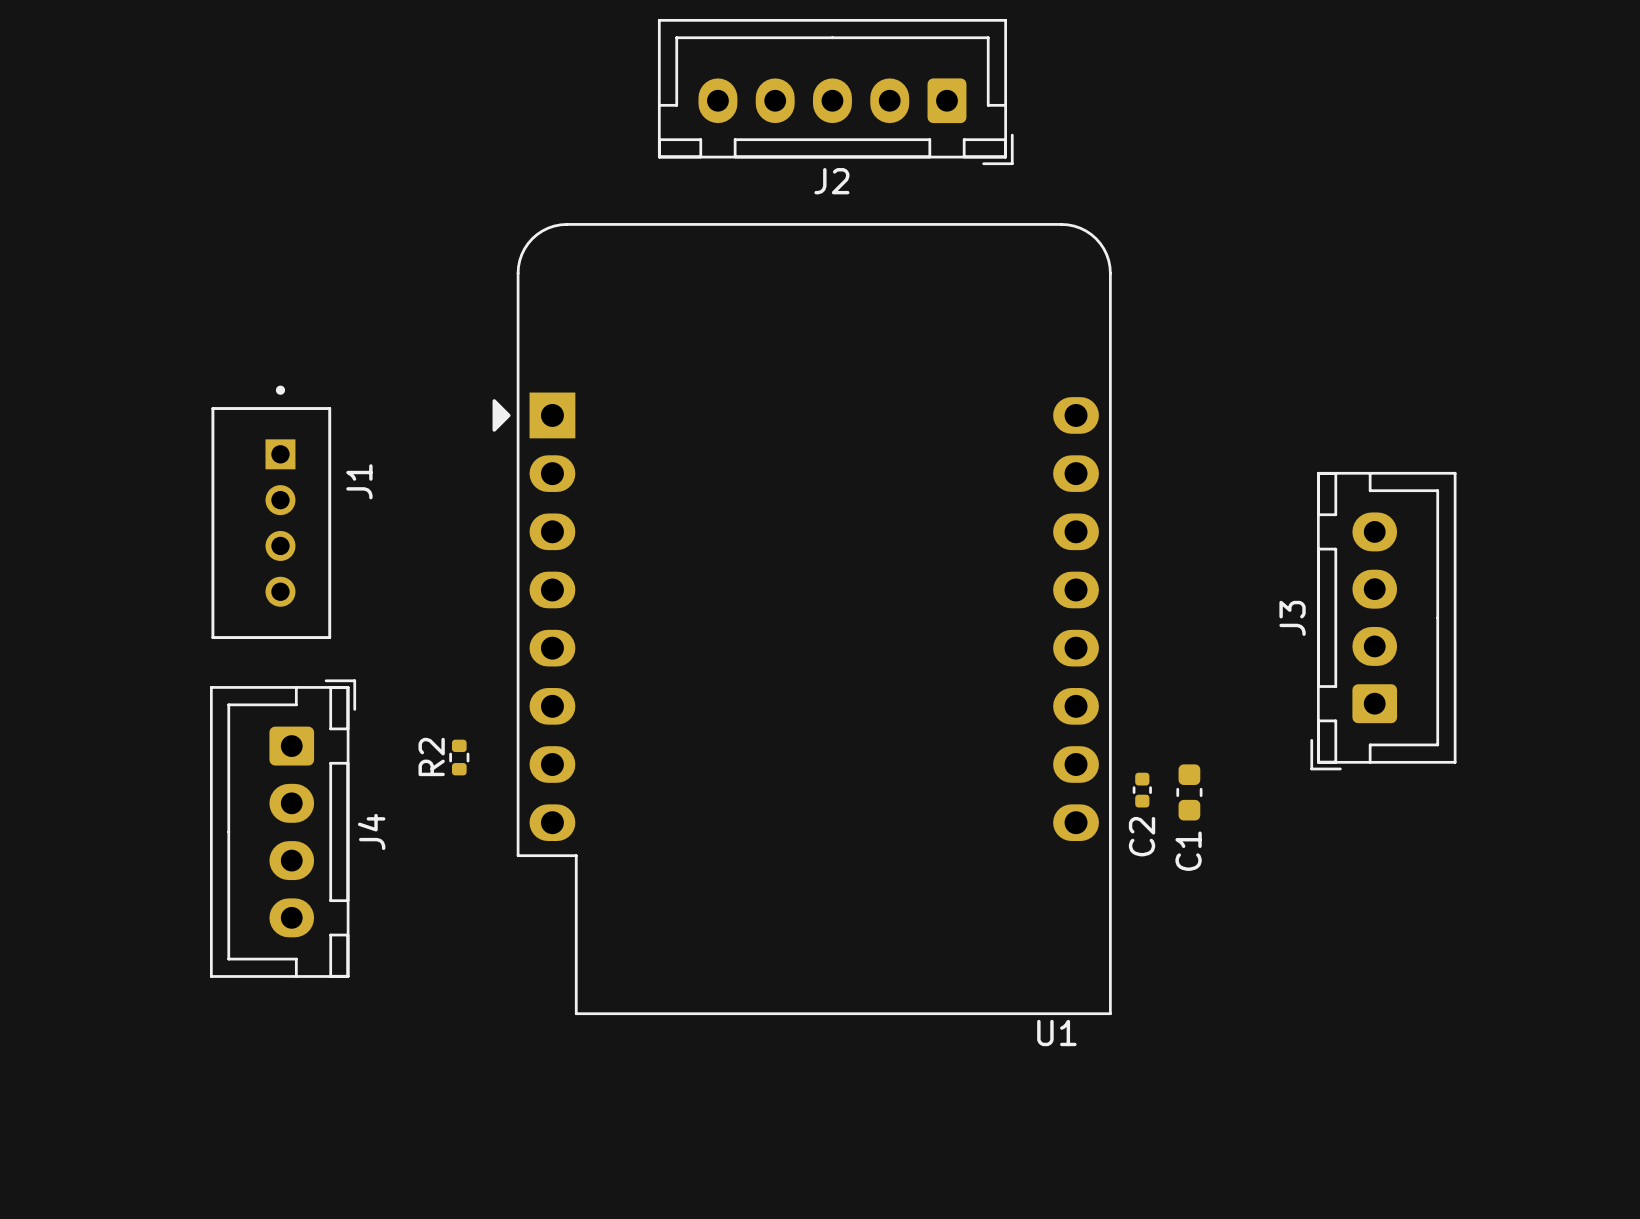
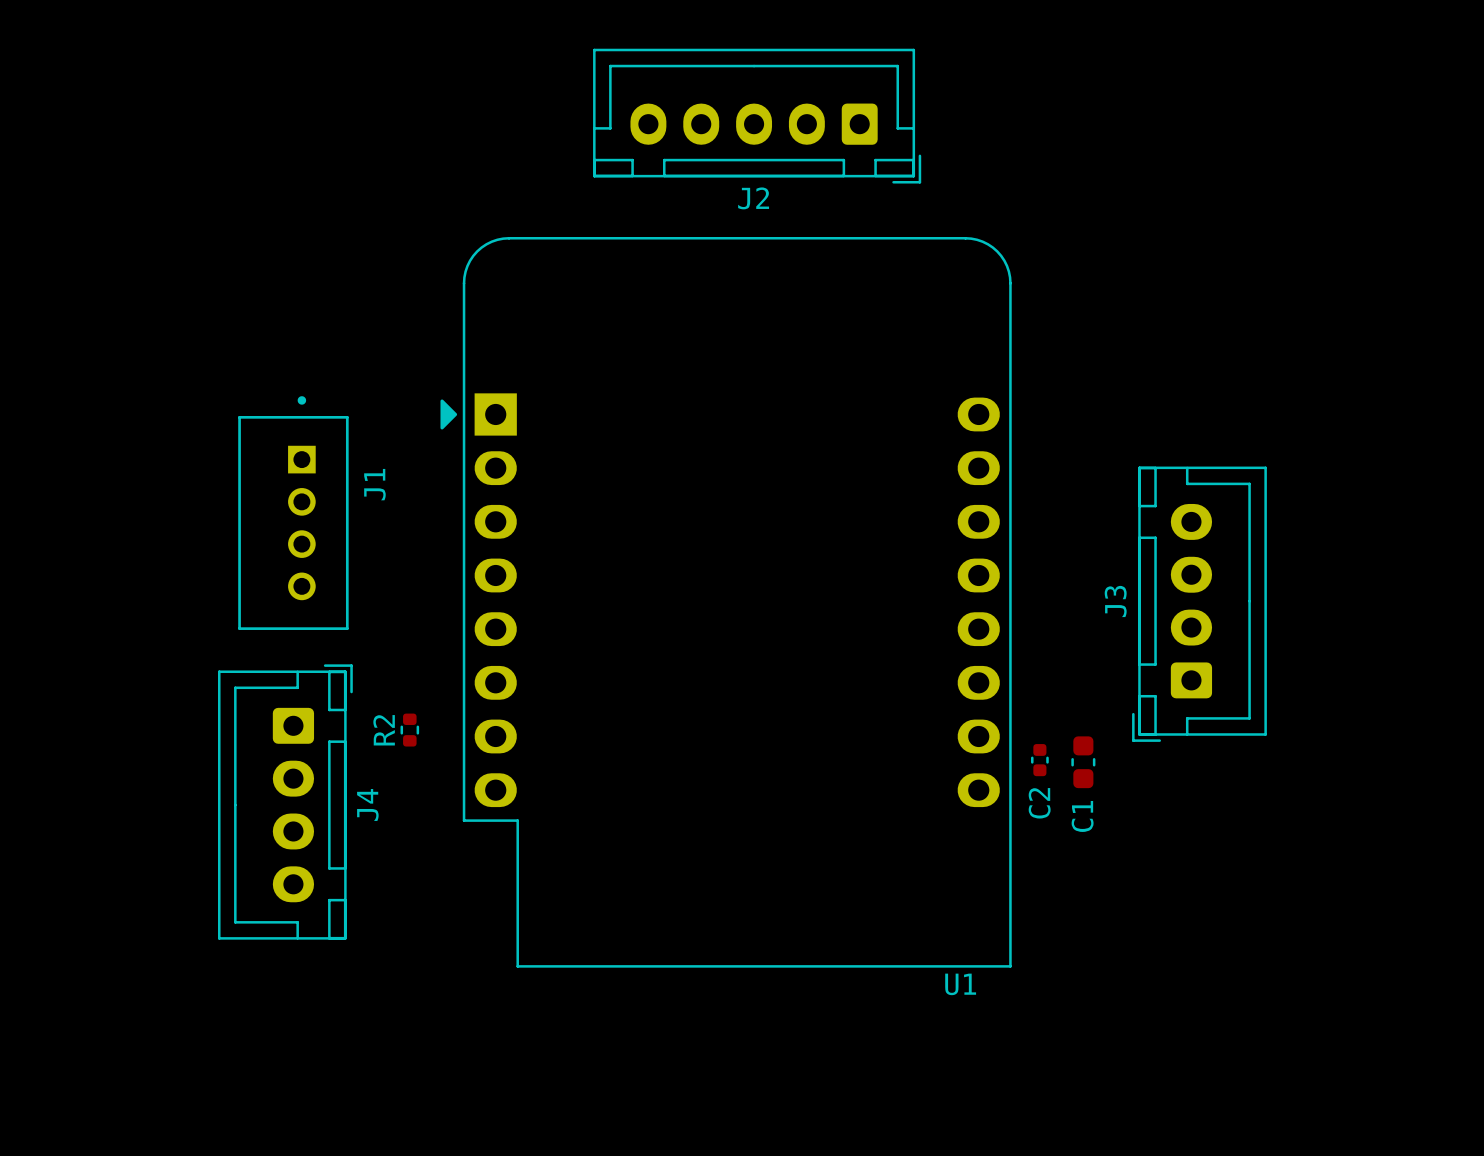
J1 position: (271, 512) -> (293, 513)
J3 position: (1383, 621) -> (1199, 604)
J4 position: (283, 828) -> (285, 802)

